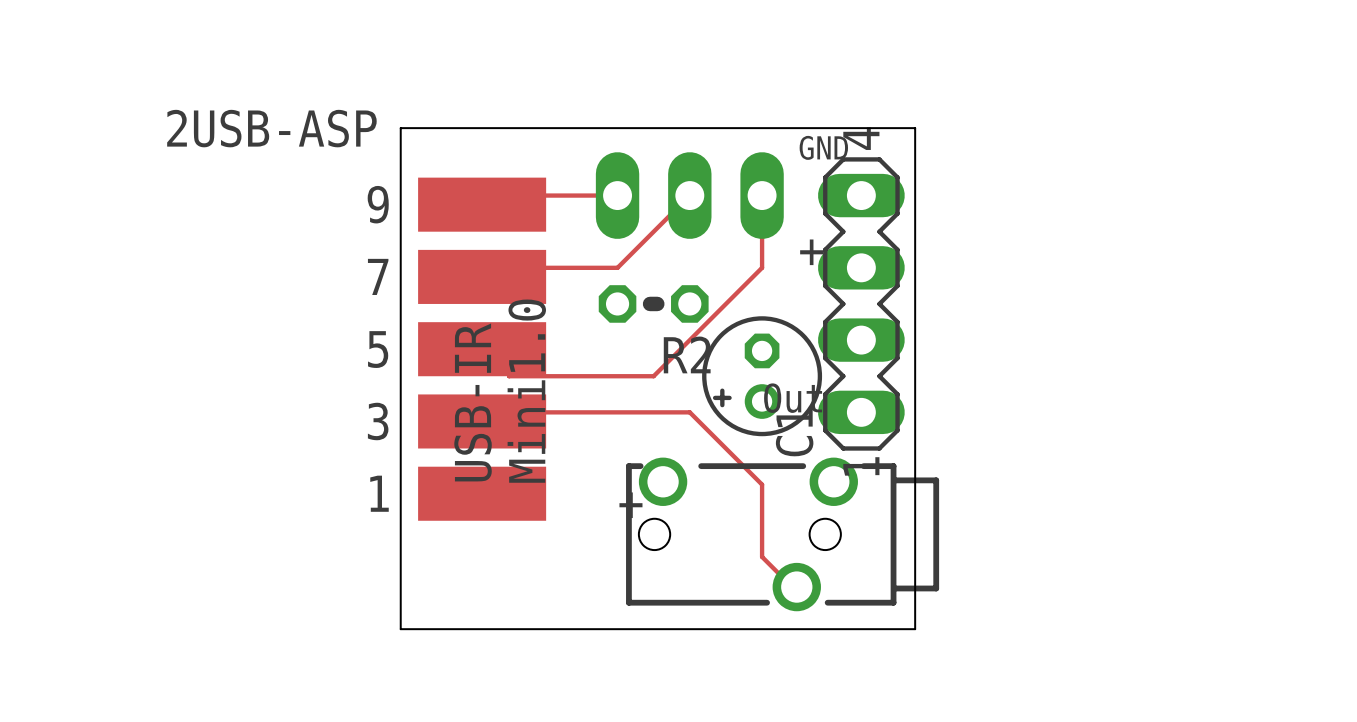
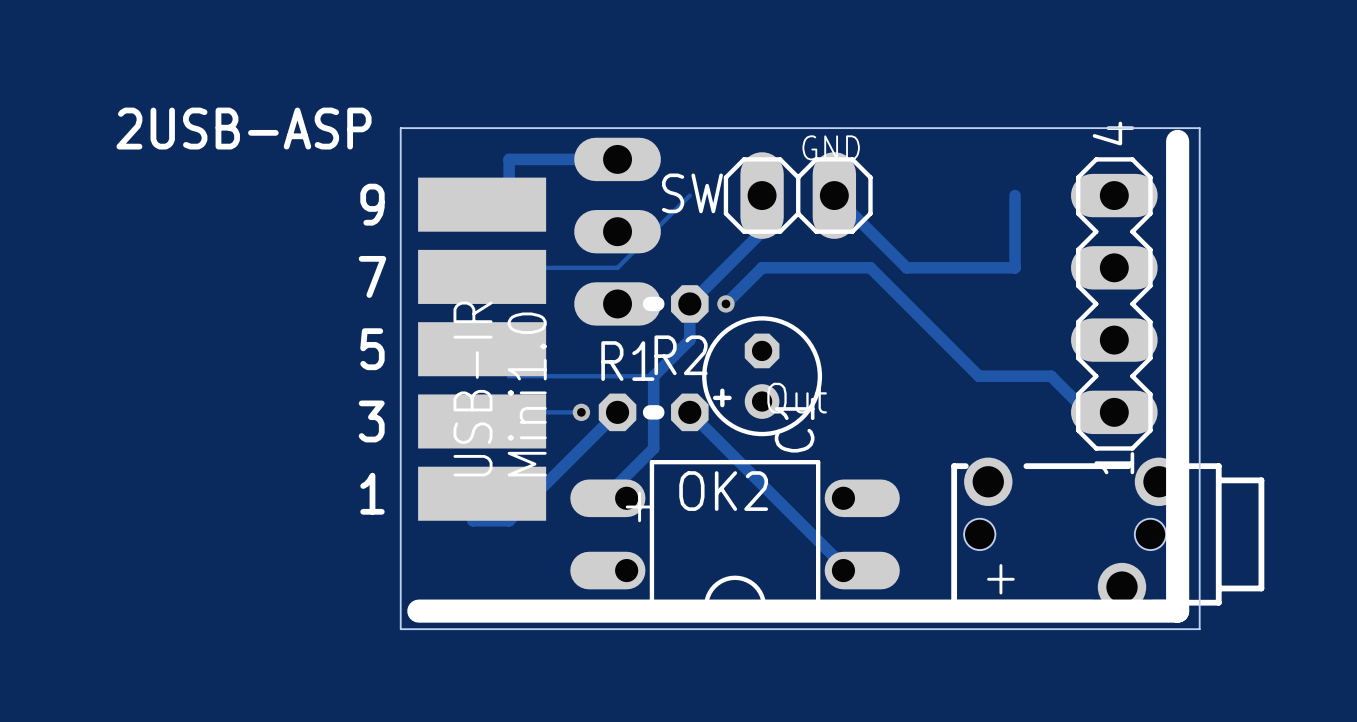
board edge: (915, 128) (915, 629) -> (915, 128) (1199, 128) (1199, 629) (915, 629)
line: none -> (1177, 141) (1177, 611) (418, 611)
track: (509, 195) (617, 195) -> (509, 195) (509, 159) (617, 159)
part rotation: 0° (689, 195) -> 90° clockwise (617, 231)
SW: none -> (798, 195)
track: none -> (834, 195) (906, 267) (1015, 267) (1015, 195)
track: (762, 231) (762, 267) -> (1114, 412) (1087, 412) (1051, 376) (978, 376) (870, 267) (762, 267)
text position: + (811, 252) -> + (1000, 579)
track width: thin (762, 267) (725, 303) -> thick (762, 267) (725, 303)
track: (725, 303) (689, 340) -> (762, 231) (689, 303) (689, 340)
via: none -> (725, 303)
part position: (861, 303) -> (1114, 303)
track width: thin (689, 340) (653, 376) -> thick (689, 340) (653, 376)
track: none -> (653, 376) (653, 448) (617, 484) (626, 498)
track: (581, 412) (689, 412) -> none
via: none -> (581, 412)
track: none -> (617, 412) (509, 520) (473, 520) (473, 484) (482, 493)
R1: none -> (653, 412)
track width: thin (689, 412) (762, 484) -> thick (689, 412) (762, 484)
track: (762, 484) (762, 556) (798, 593) (796, 587) -> (762, 484) (834, 556) (843, 570)
OK2: none -> (735, 534)
part position: (782, 534) -> (1107, 534)

